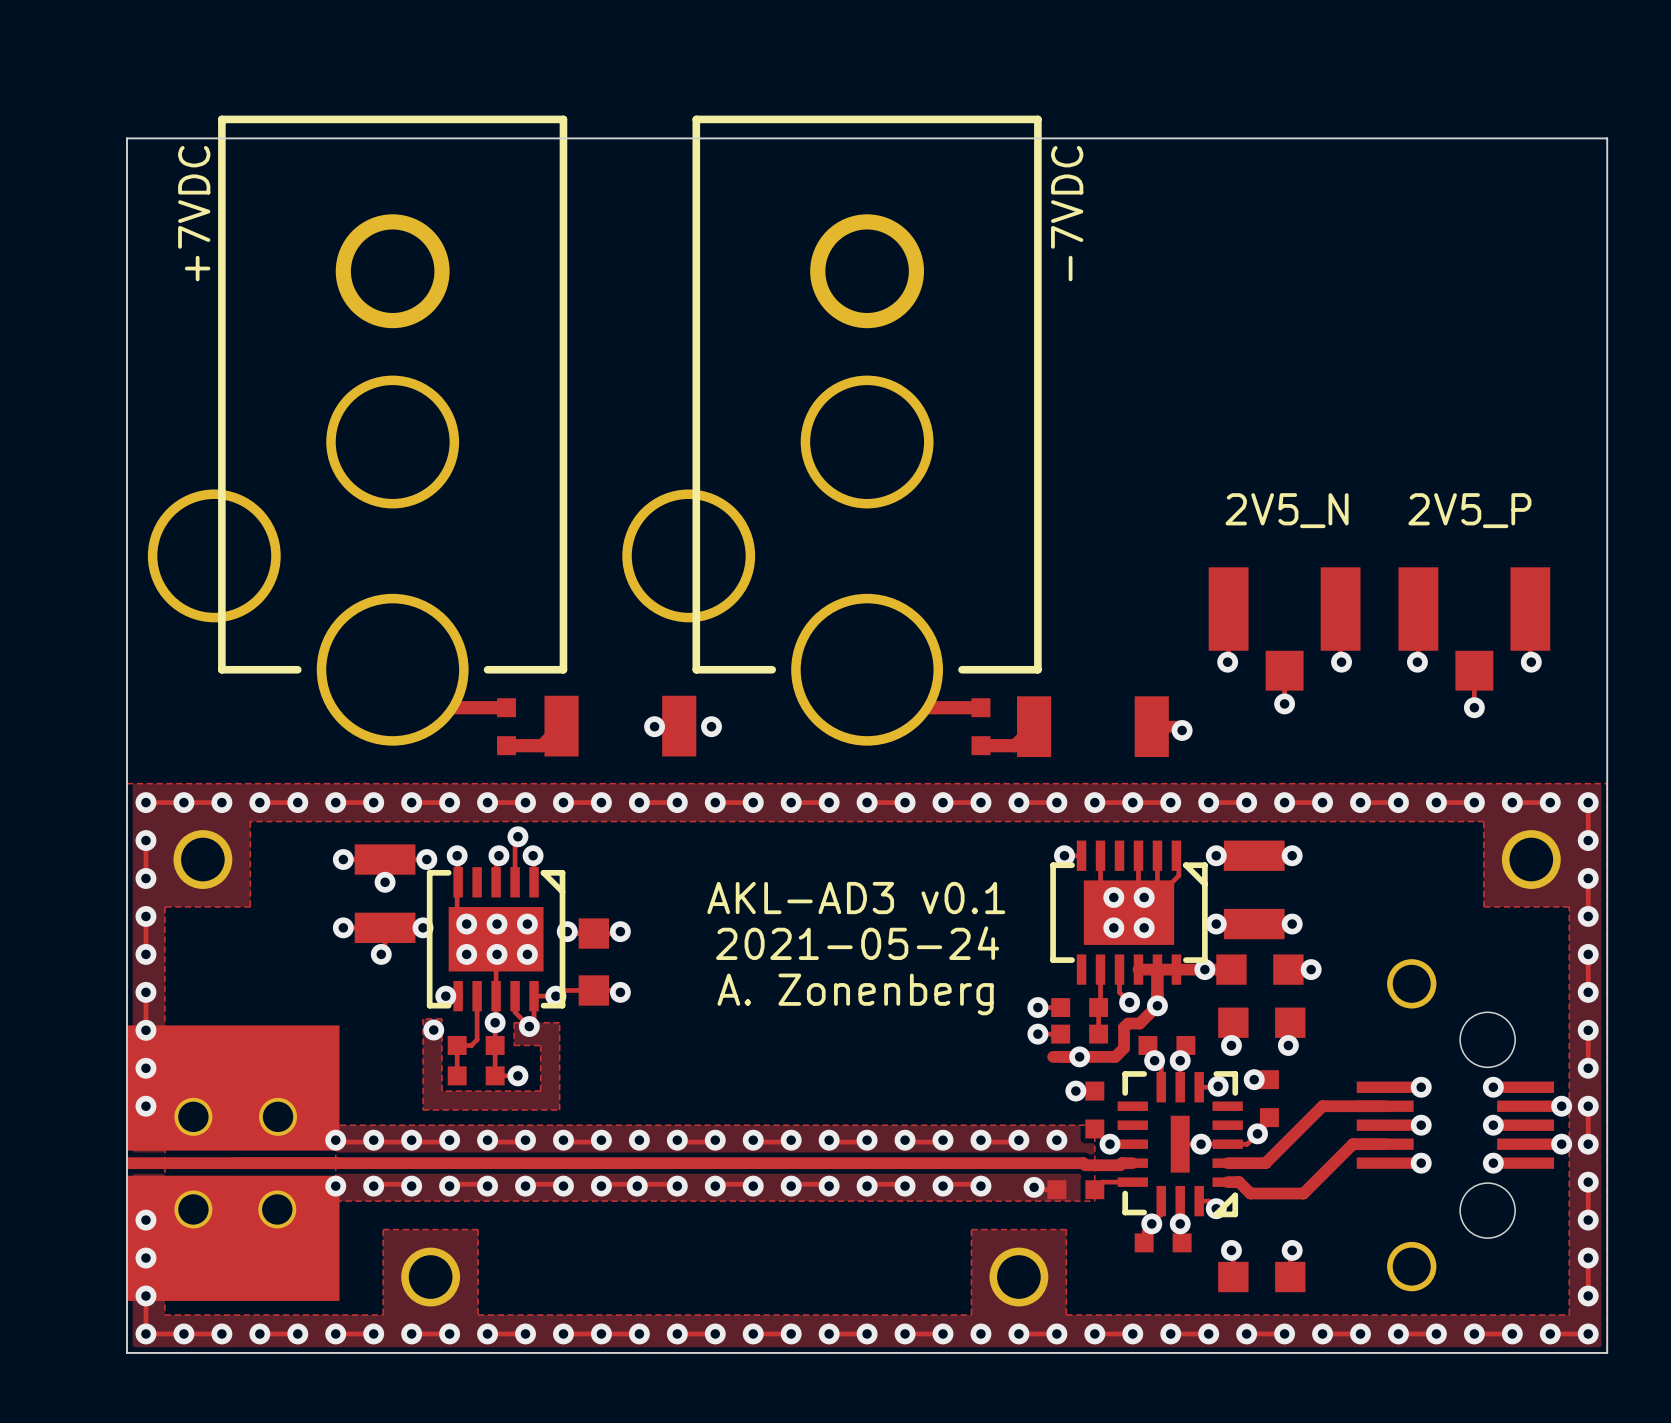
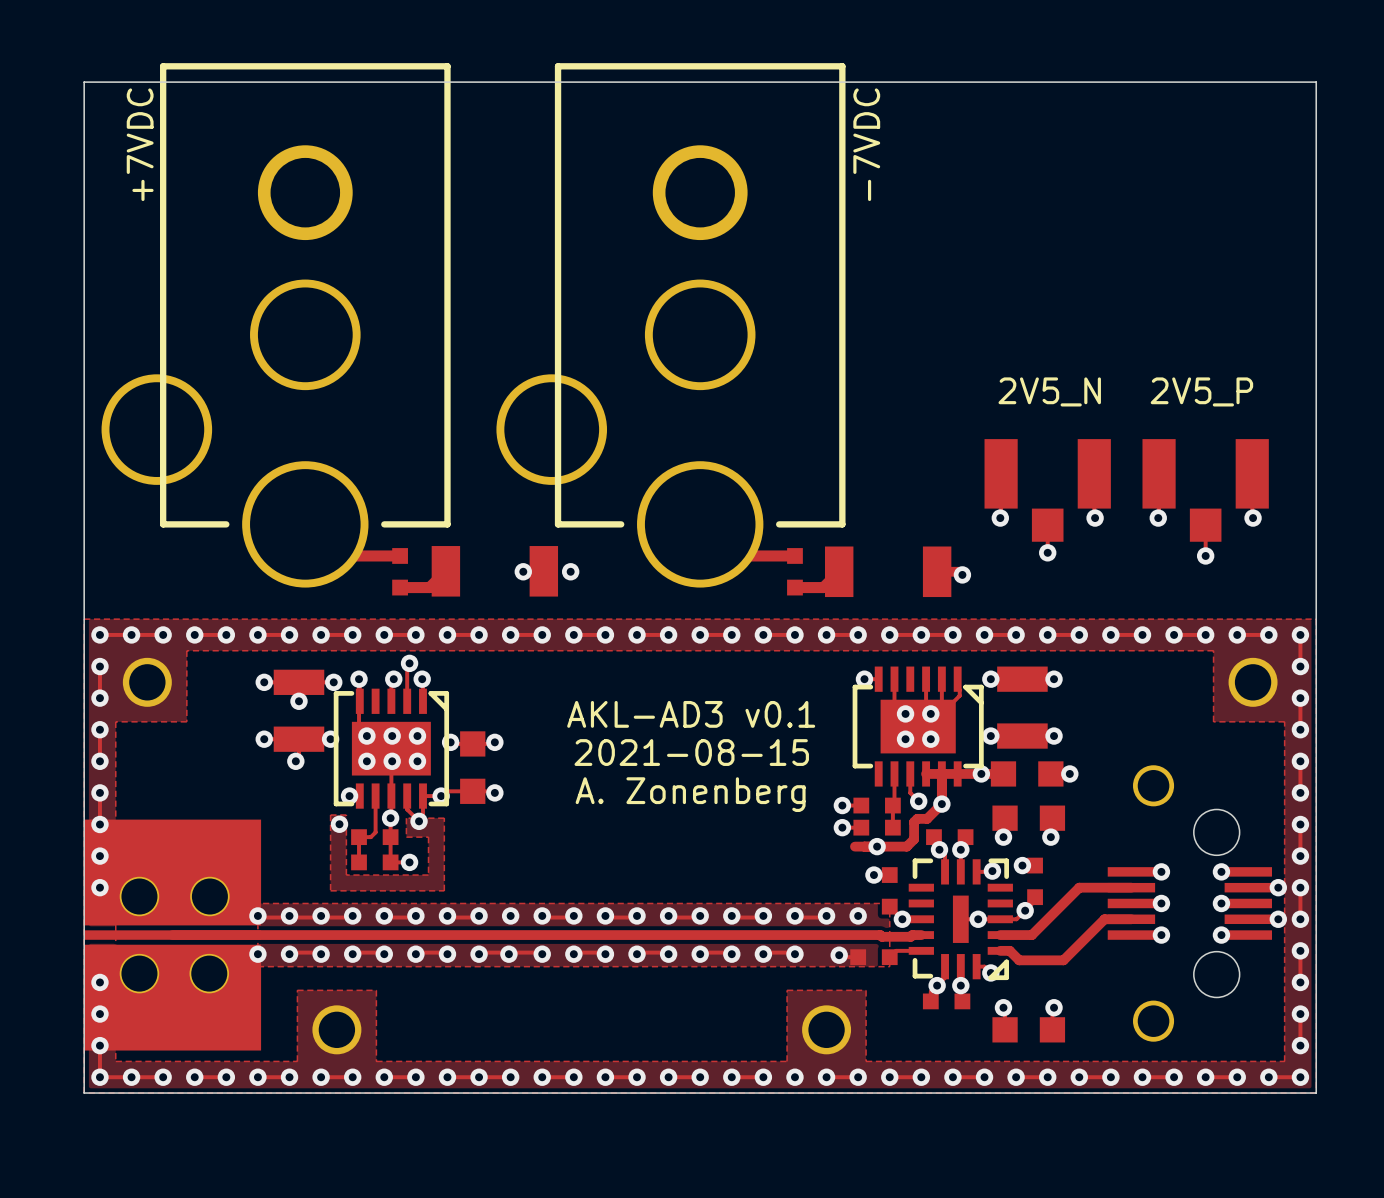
text: 2021-05-24 (857, 943) -> 2021-08-15 (691, 752)
part footprint: [126, 1025, 340, 1301] -> [84, 819, 262, 1051]

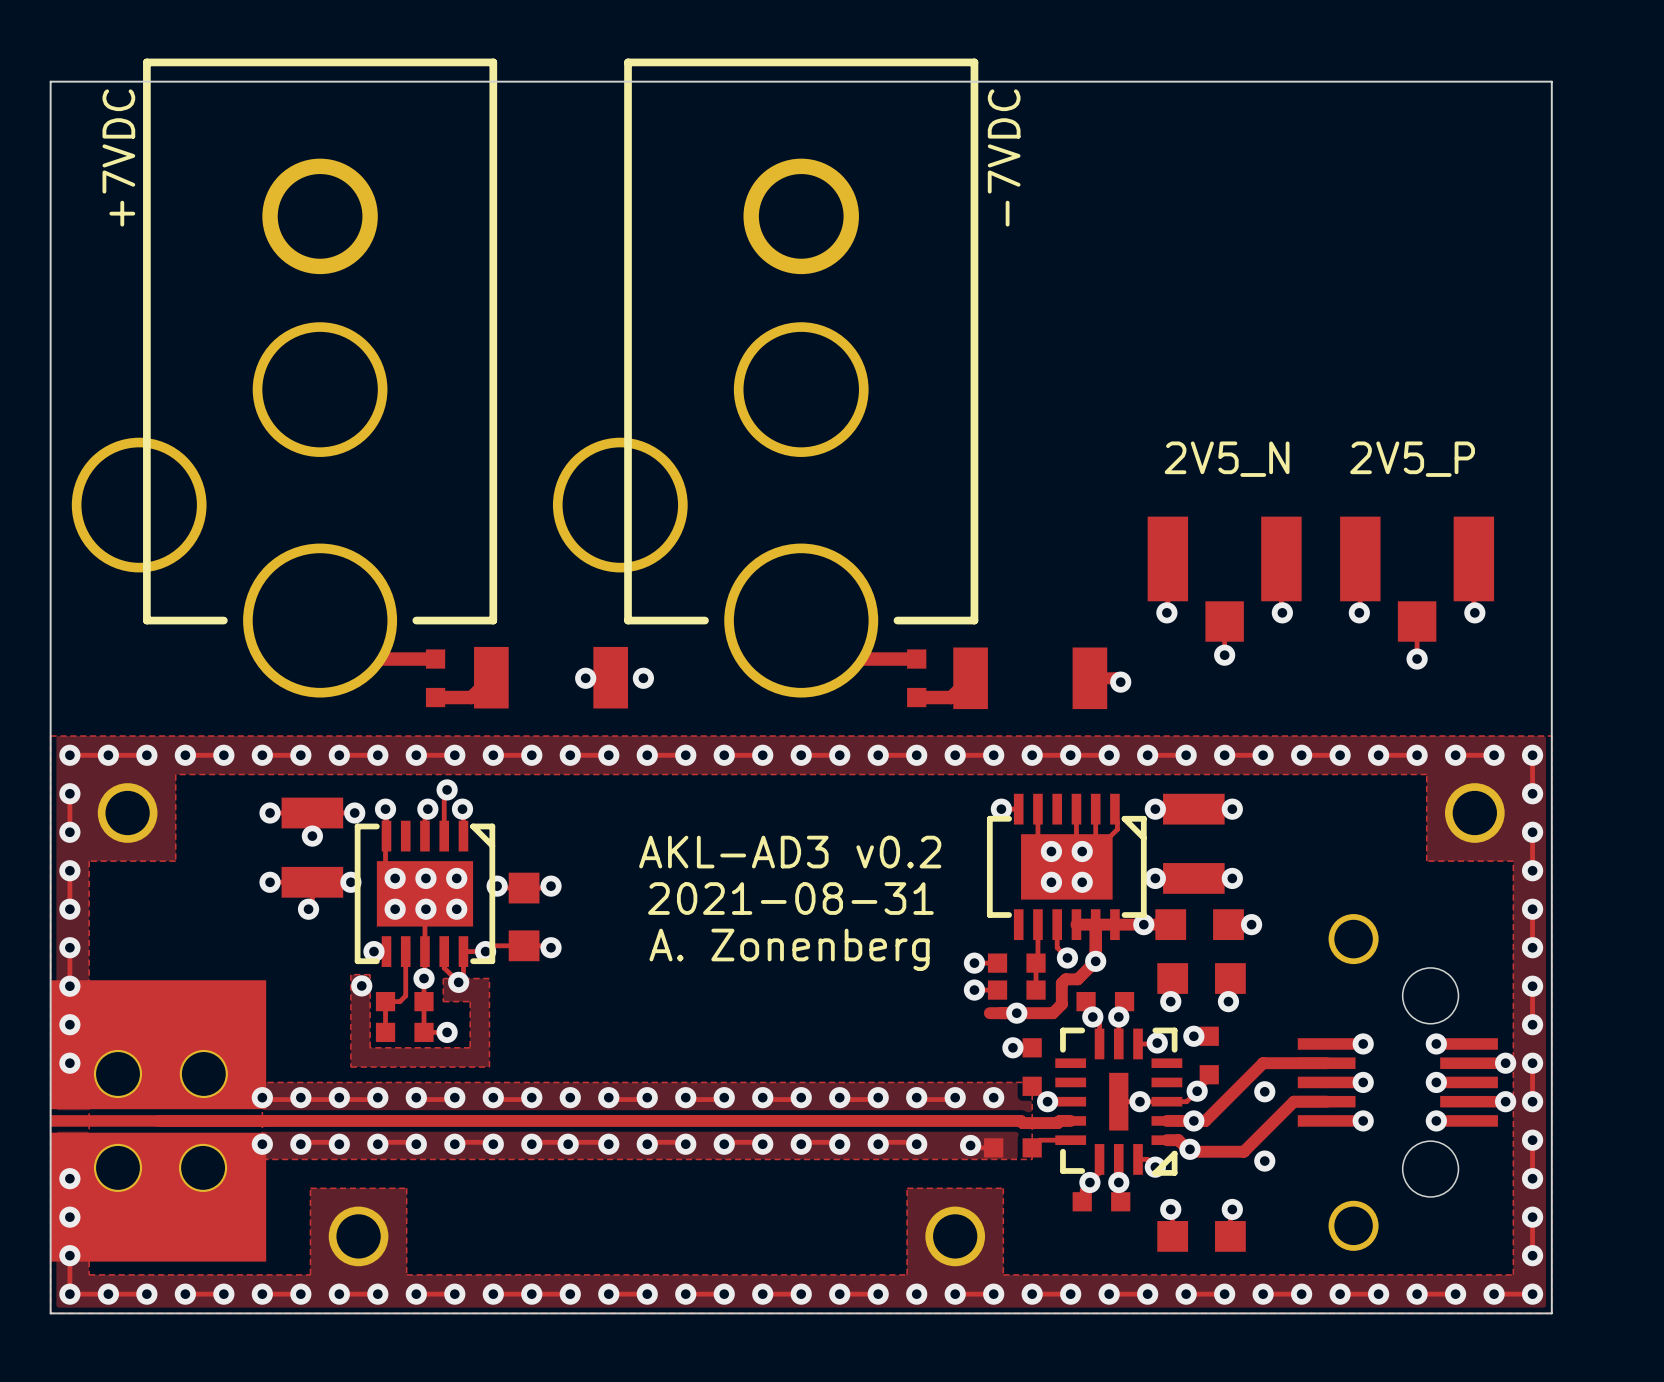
text: AKL-AD3 v0.1 (691, 714) -> AKL-AD3 v0.2 (790, 852)
text: 2021-08-15 (691, 752) -> 2021-08-31 (790, 898)
via: none -> (1264, 1091)
via: none -> (1193, 1120)
via: none -> (1189, 1149)
via: none -> (1264, 1161)

